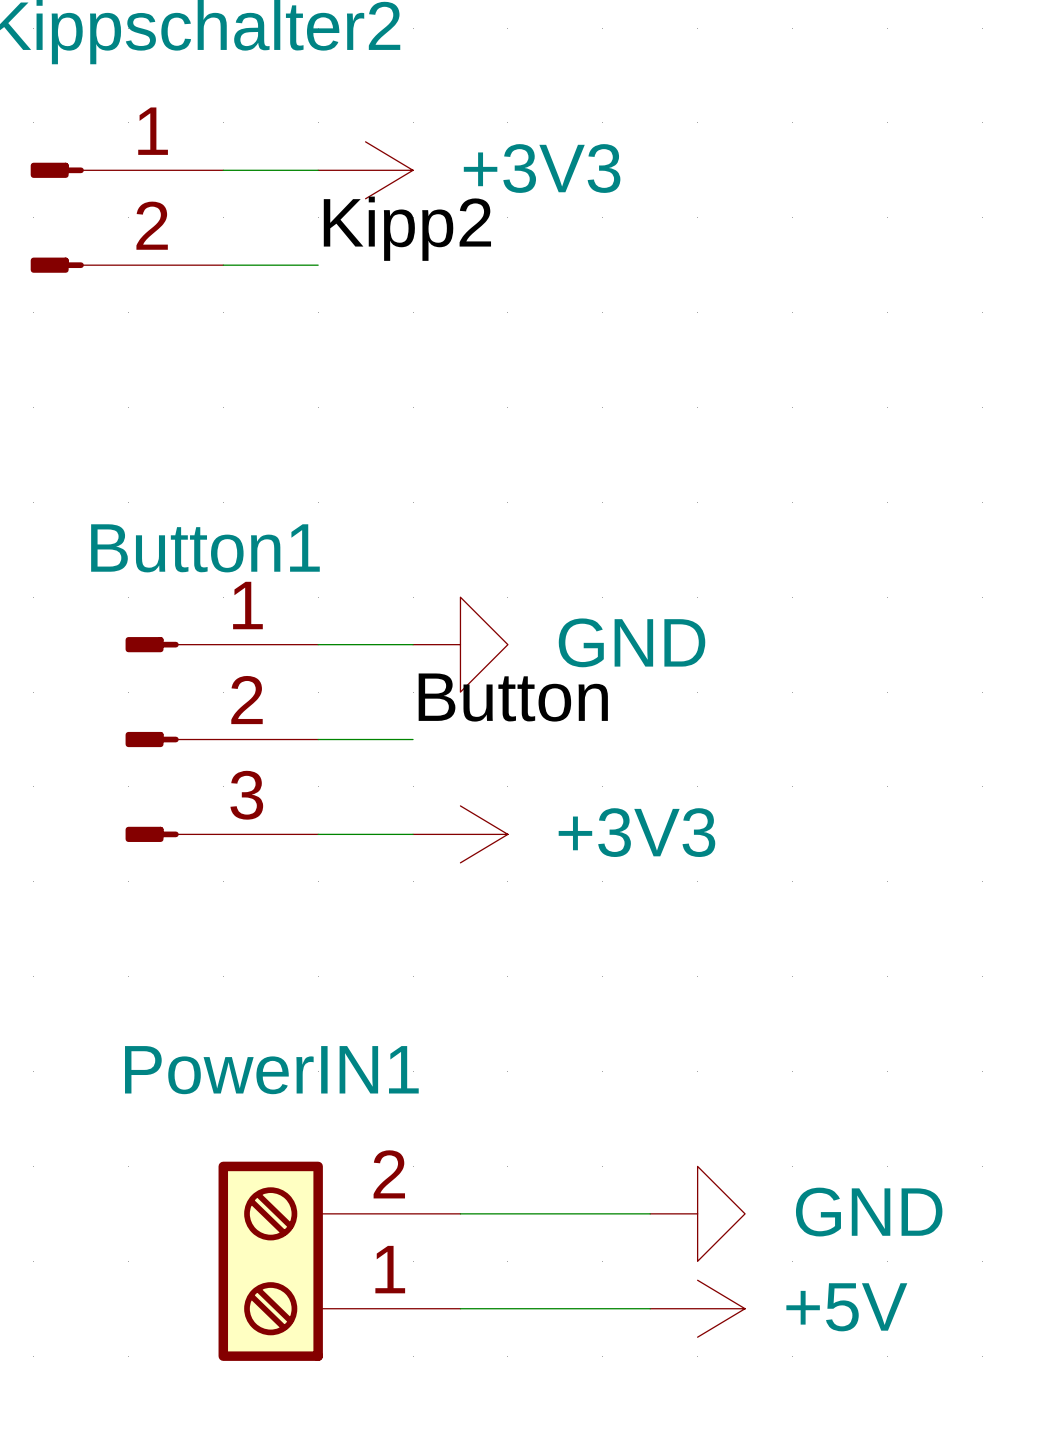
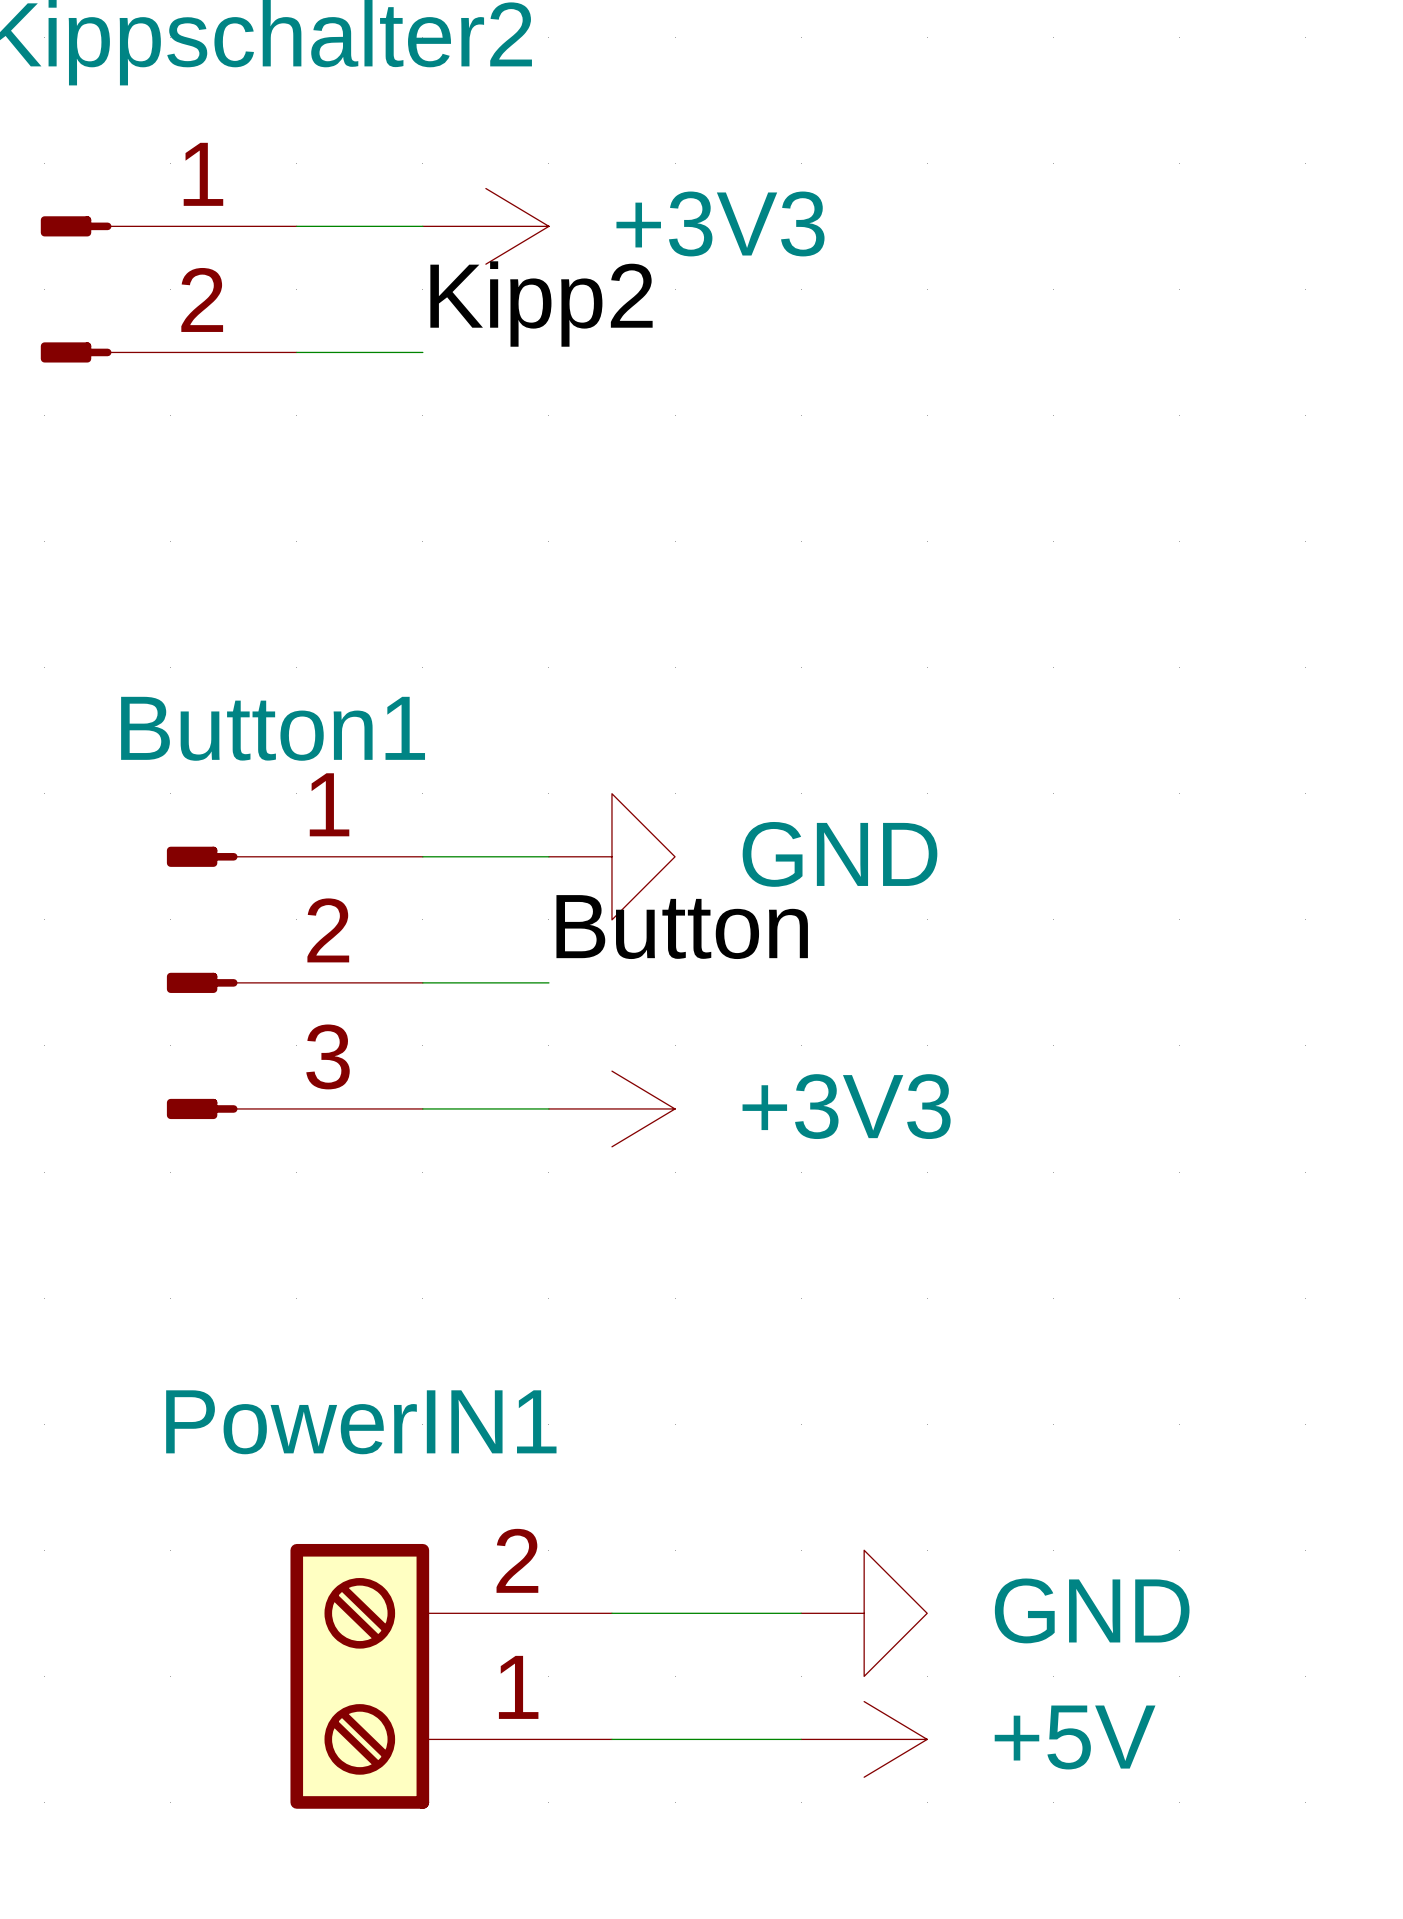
power symbol position: GND (697, 1213) -> GND (864, 1613)
power symbol text position: +5V (846, 1307) -> +5V (1075, 1737)
power symbol position: +5V (697, 1308) -> +5V (864, 1739)

